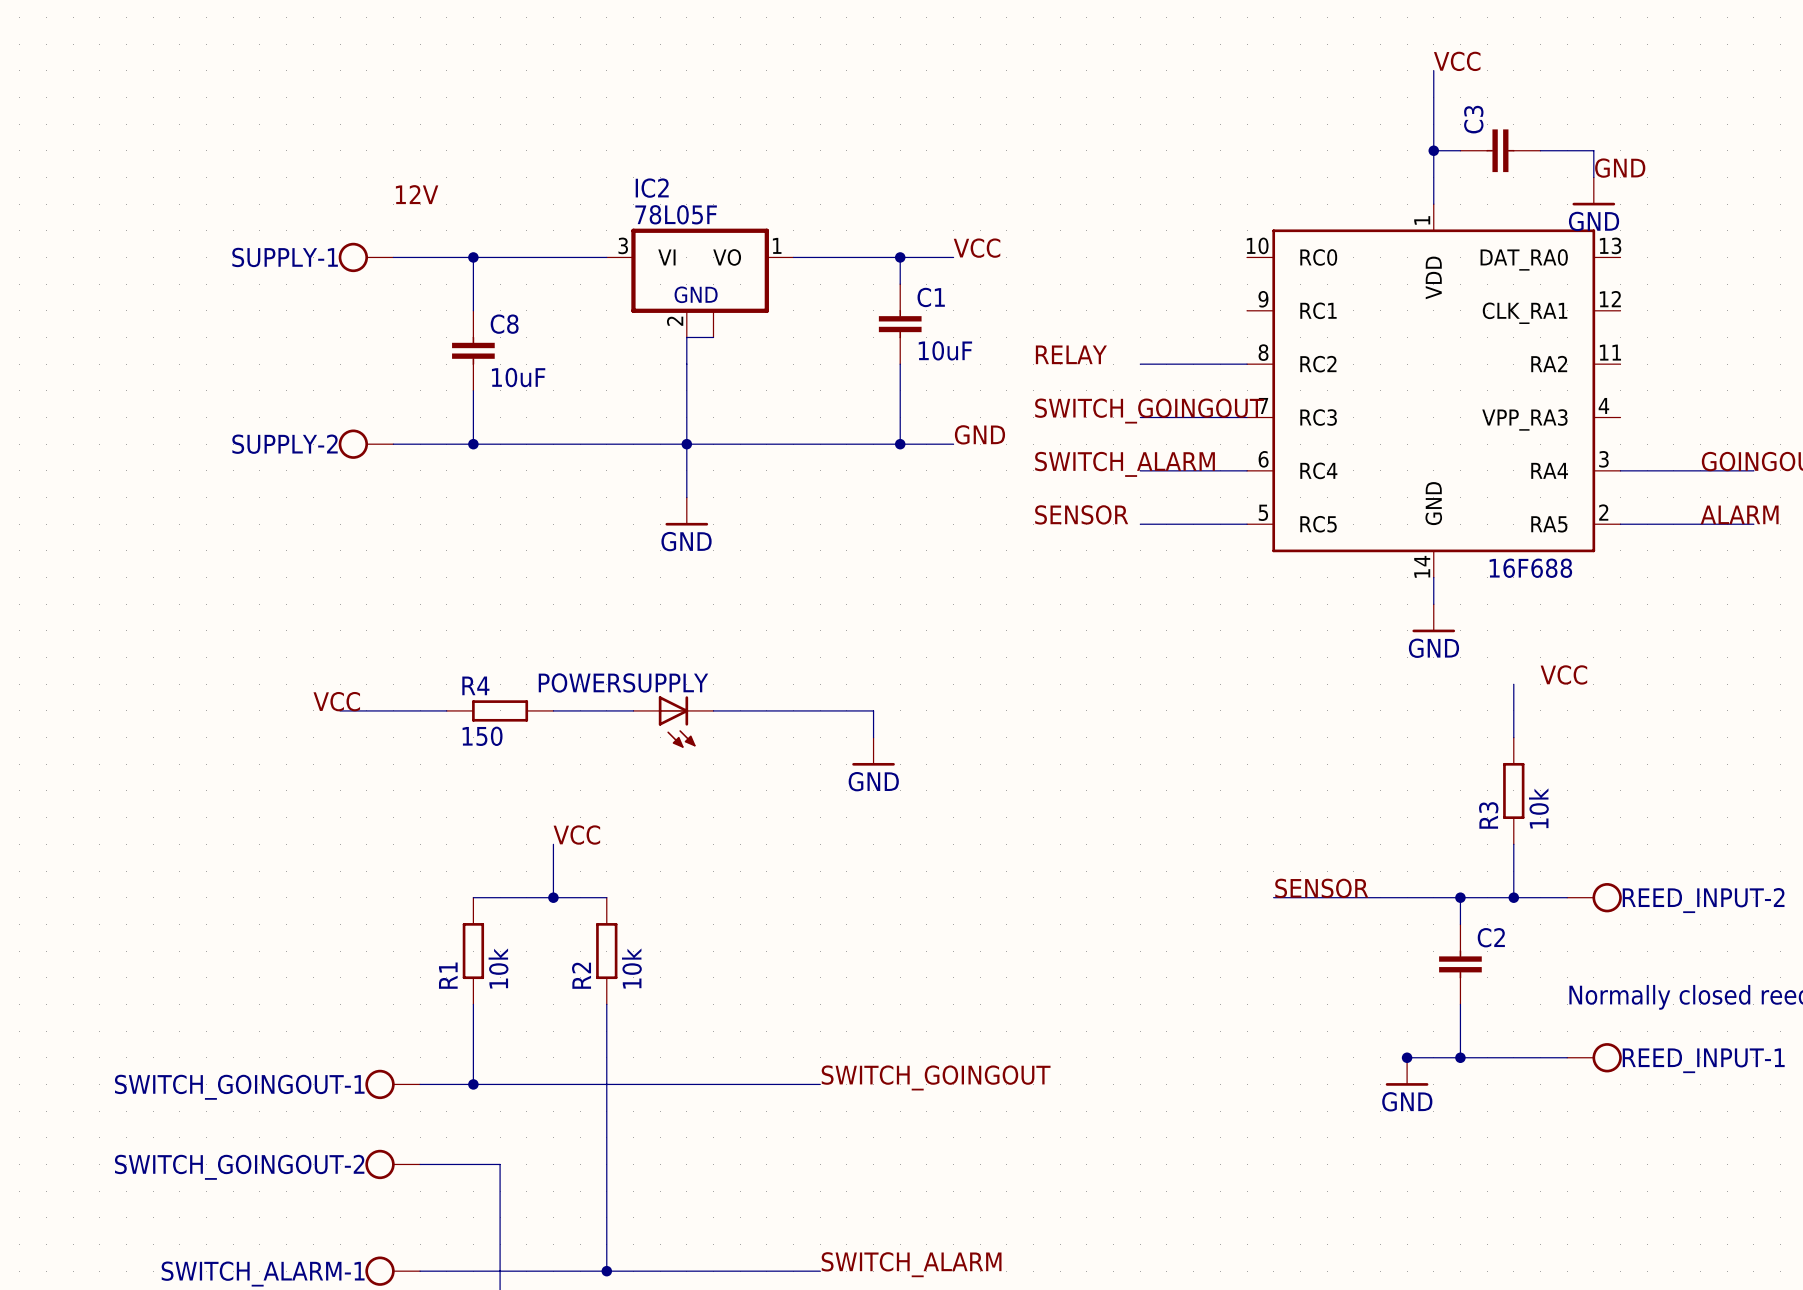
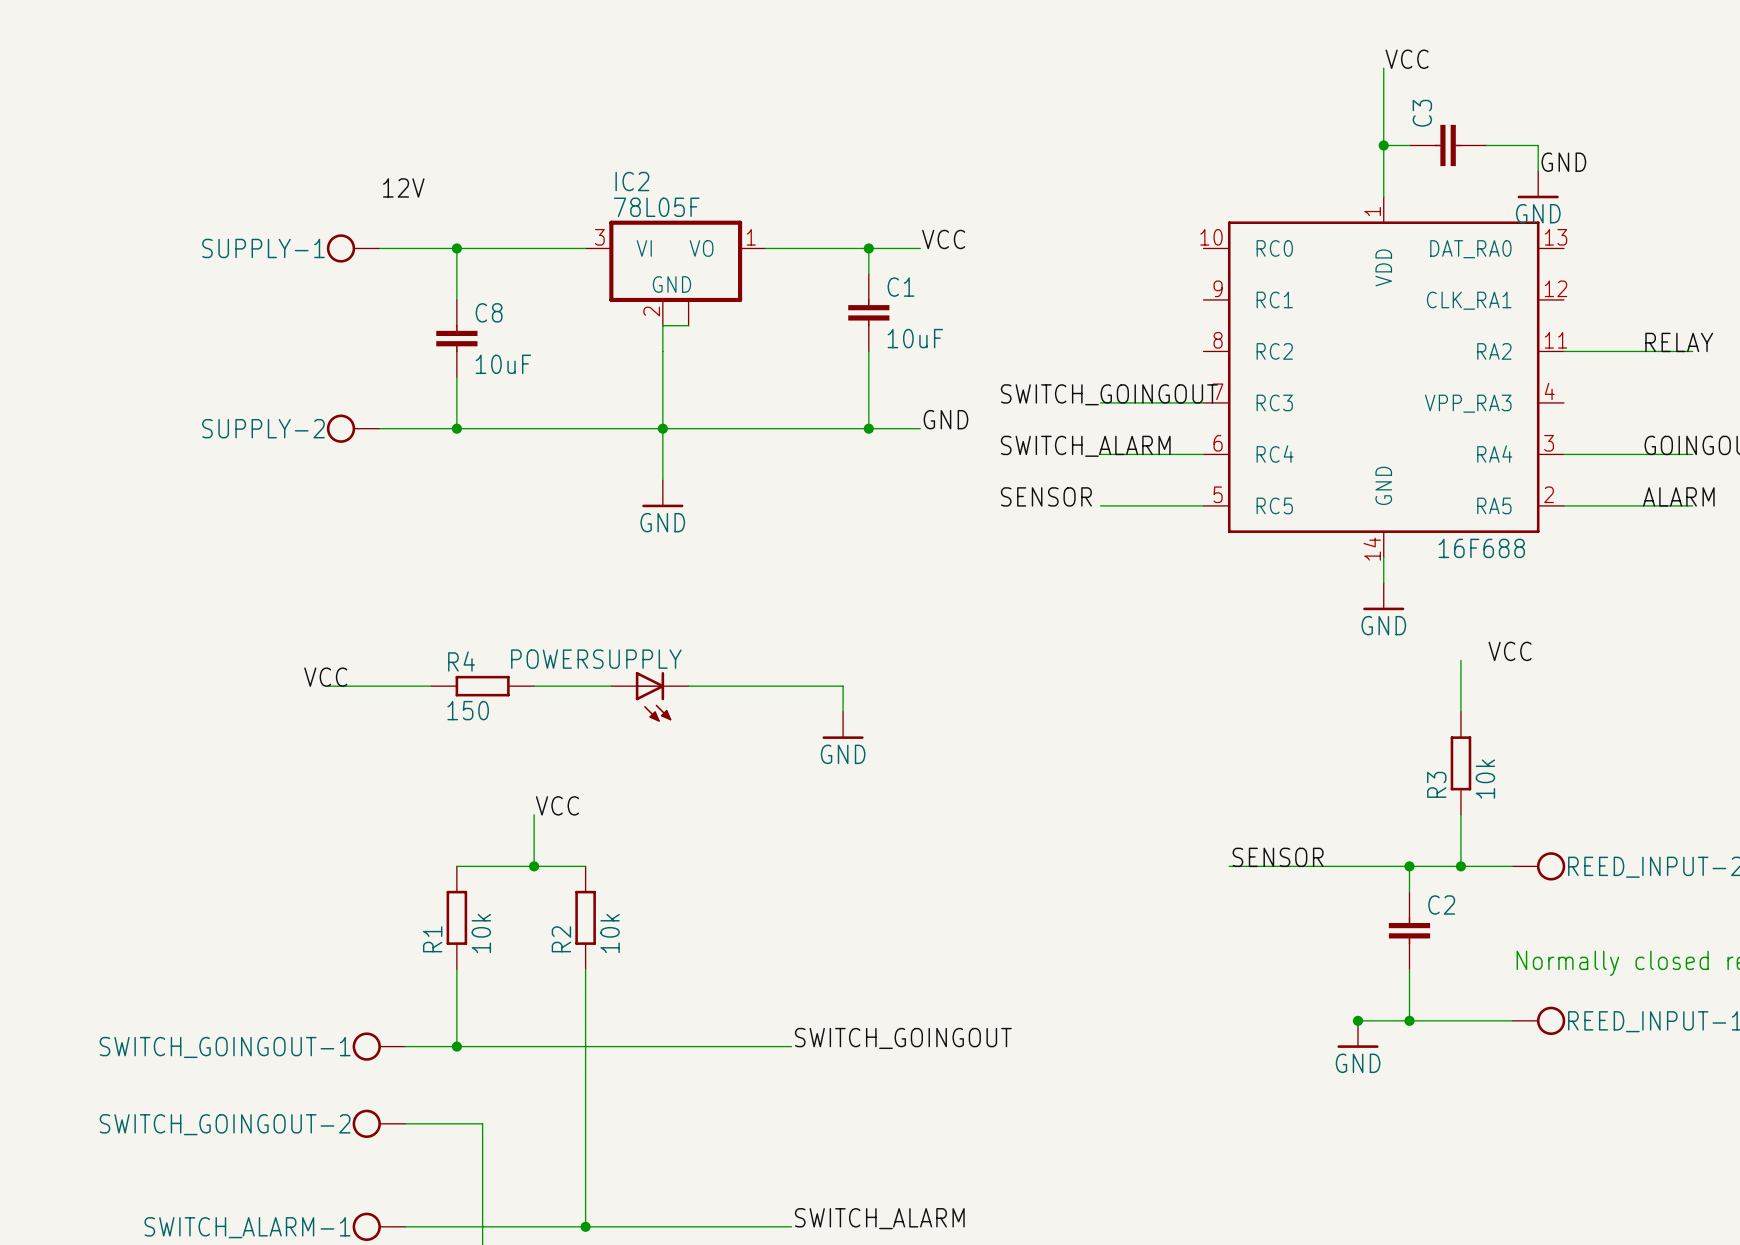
label: RELAY (1071, 354) -> none
label: none -> RELAY (1679, 342)
wire: (1140, 364) (1247, 364) -> none
wire: none -> (1563, 351) (1692, 351)

